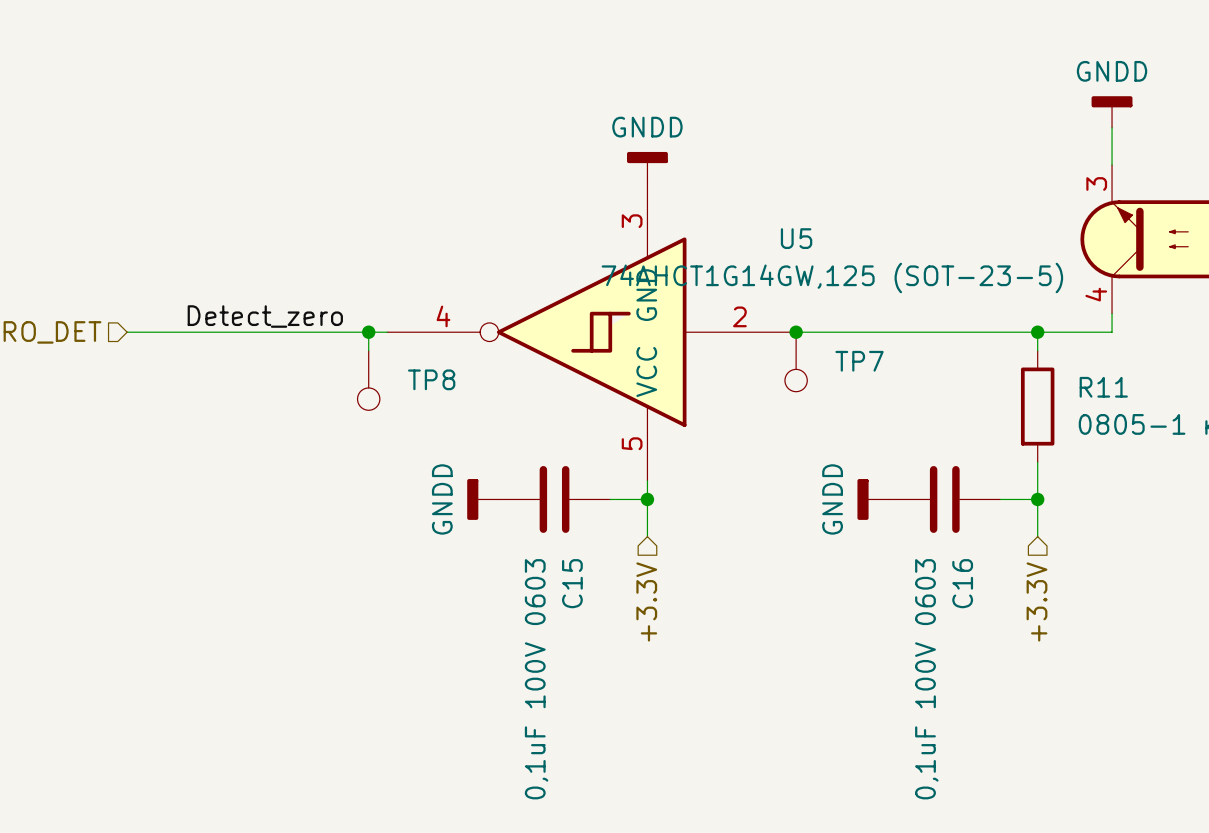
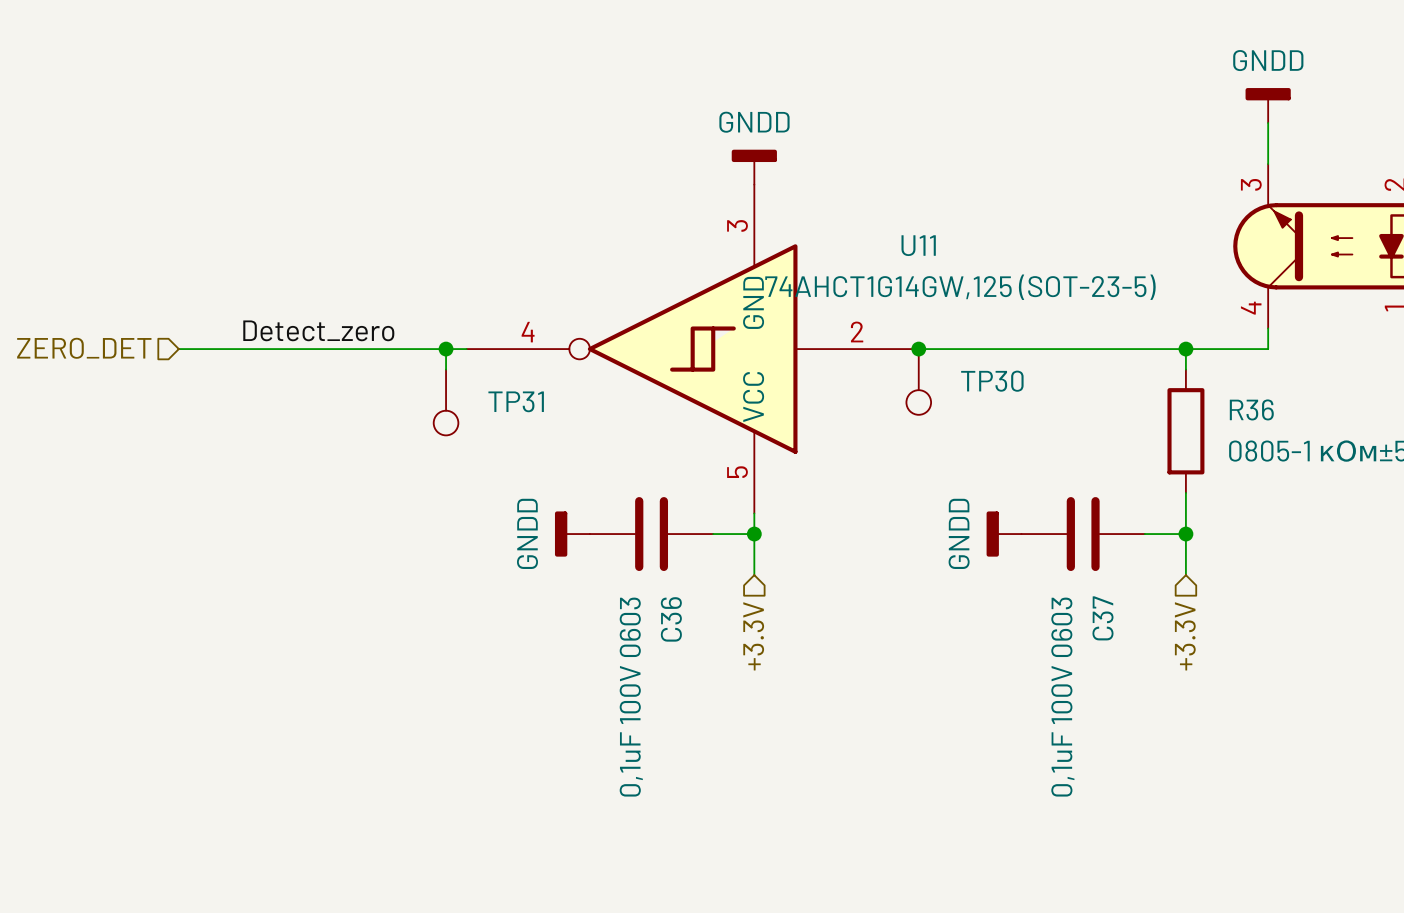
U5 name: U5 (796, 238) -> U11 (918, 245)
TP7 name: TP7 (859, 361) -> TP30 (992, 381)
TP8 name: TP8 (431, 379) -> TP31 (516, 401)
R11 name: R11 (1103, 387) -> R36 (1251, 409)
C15 name: C15 (572, 583) -> C36 (671, 619)
C16 name: C16 (962, 583) -> C37 (1102, 618)

